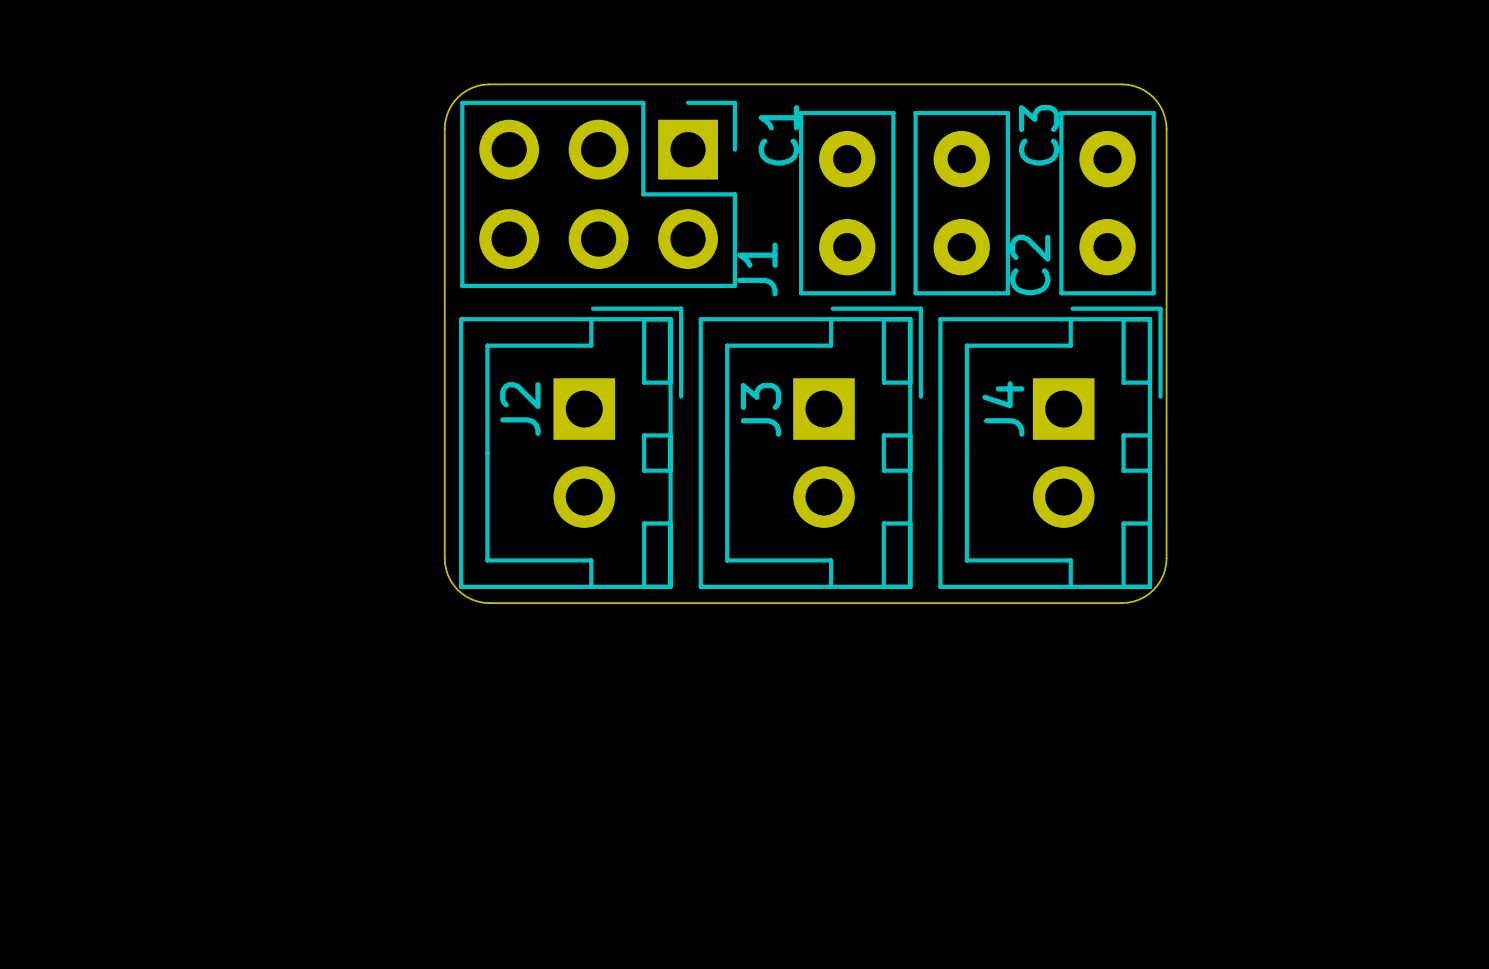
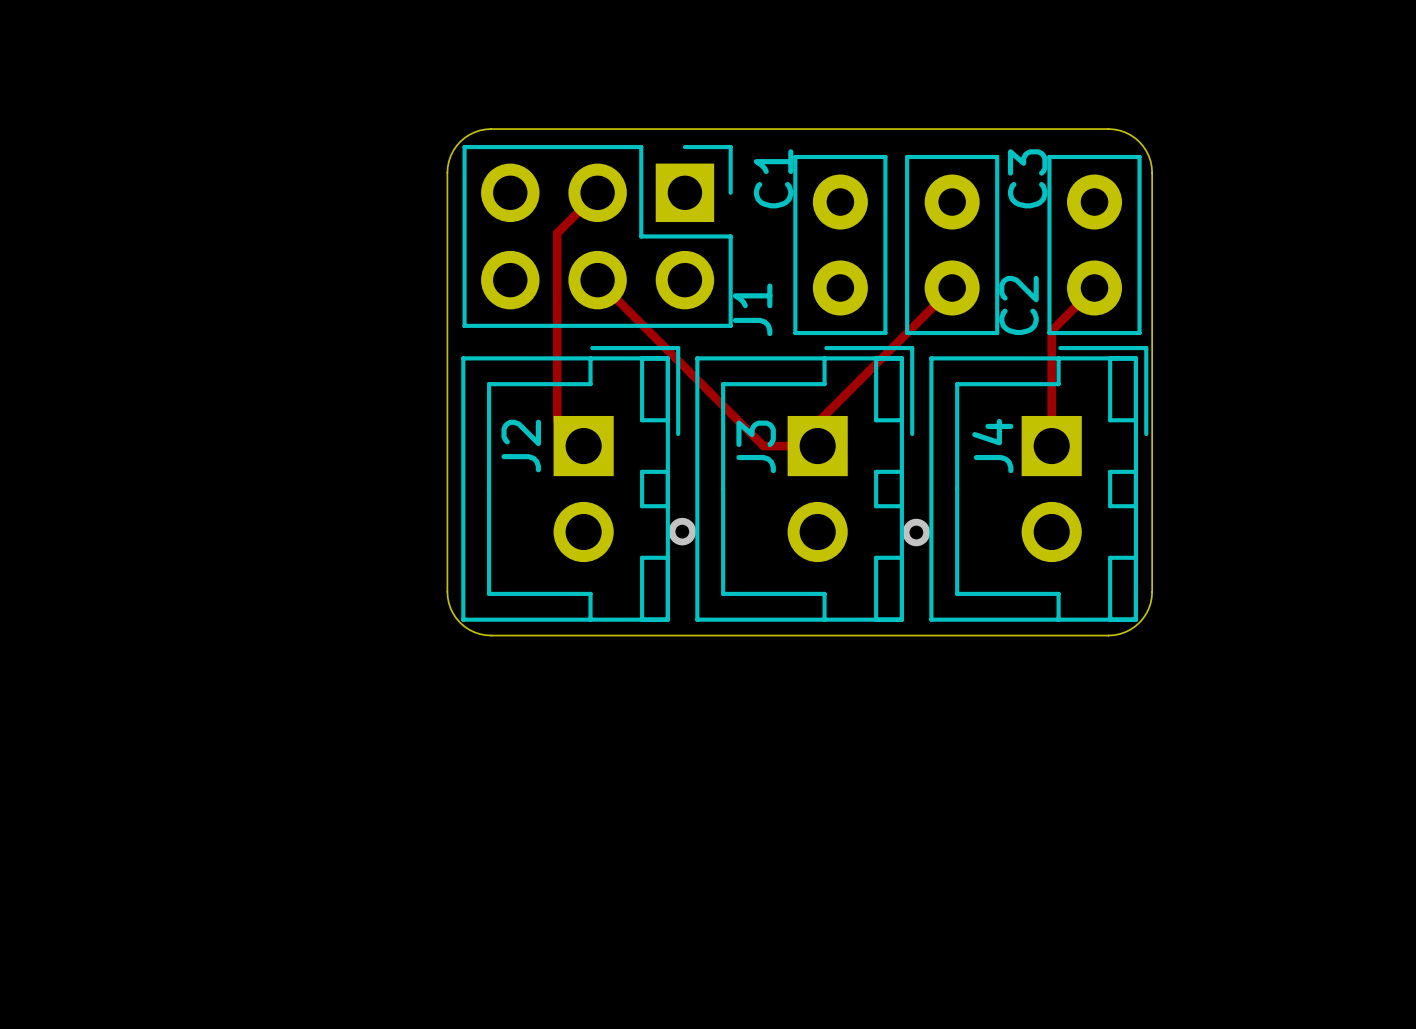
track: none -> (597, 192) (557, 233) (557, 419) (583, 446)
track: none -> (597, 280) (763, 446) (817, 446) (817, 422) (952, 287)
track: none -> (1094, 287) (1051, 330) (1051, 446)
via: none -> (682, 531)
via: none -> (916, 532)

